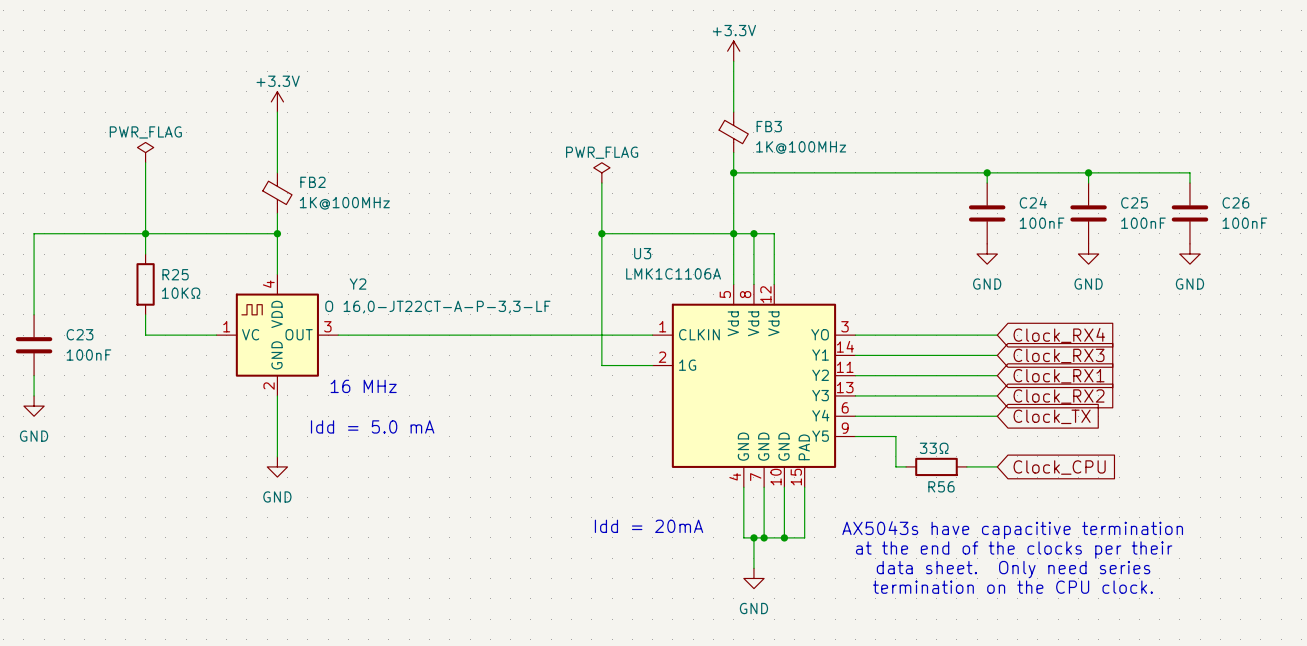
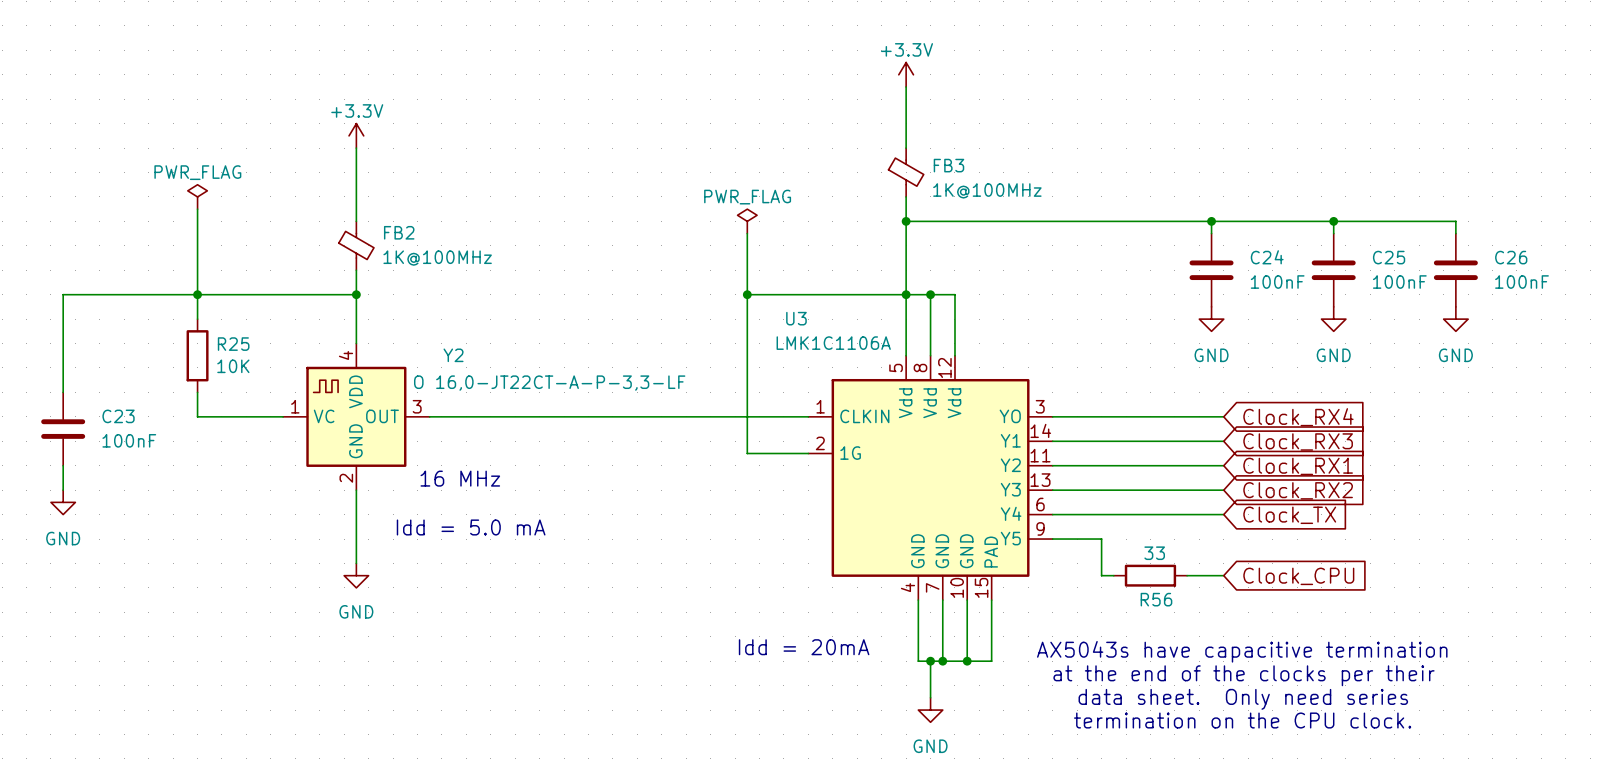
R25 value: 10KΩ (181, 293) -> 10K (233, 366)
R56 value: 33Ω (934, 448) -> 33 (1154, 553)

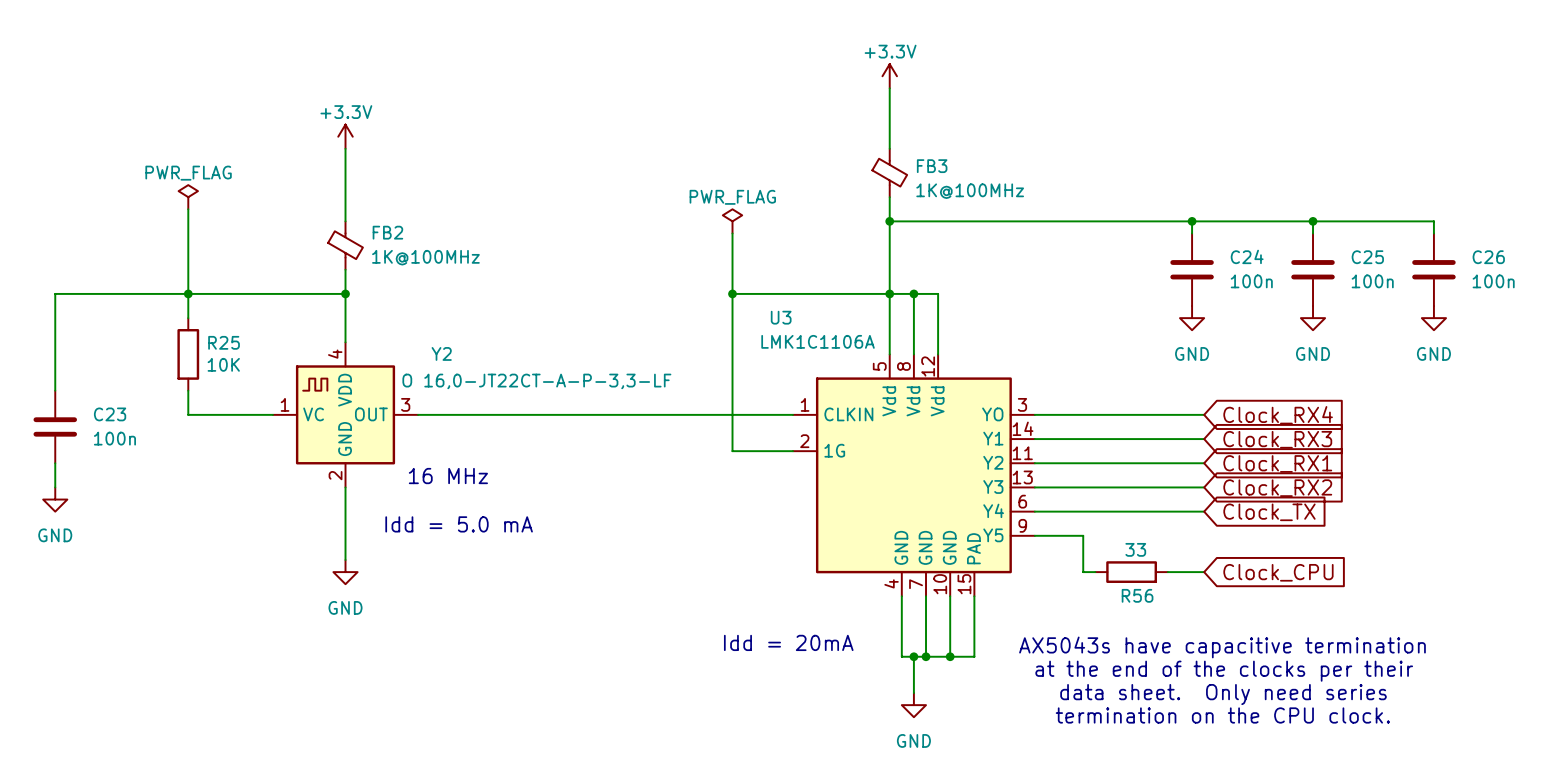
C24 value: 100nF (1277, 282) -> 100n (1251, 281)
C25 value: 100nF (1399, 282) -> 100n (1372, 281)
C26 value: 100nF (1522, 282) -> 100n (1493, 281)
C23 value: 100nF (129, 440) -> 100n (114, 438)

